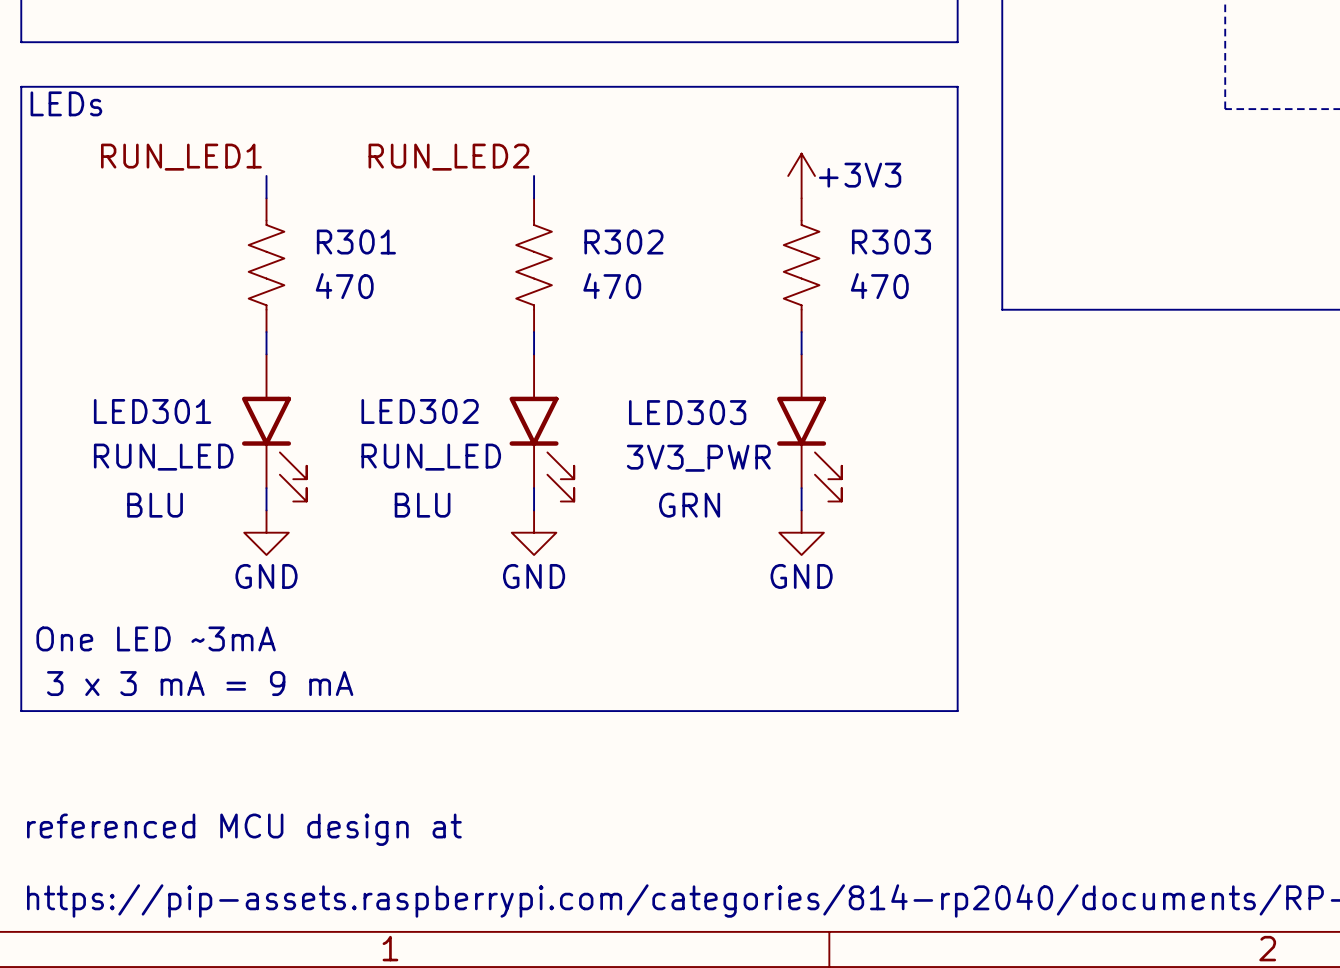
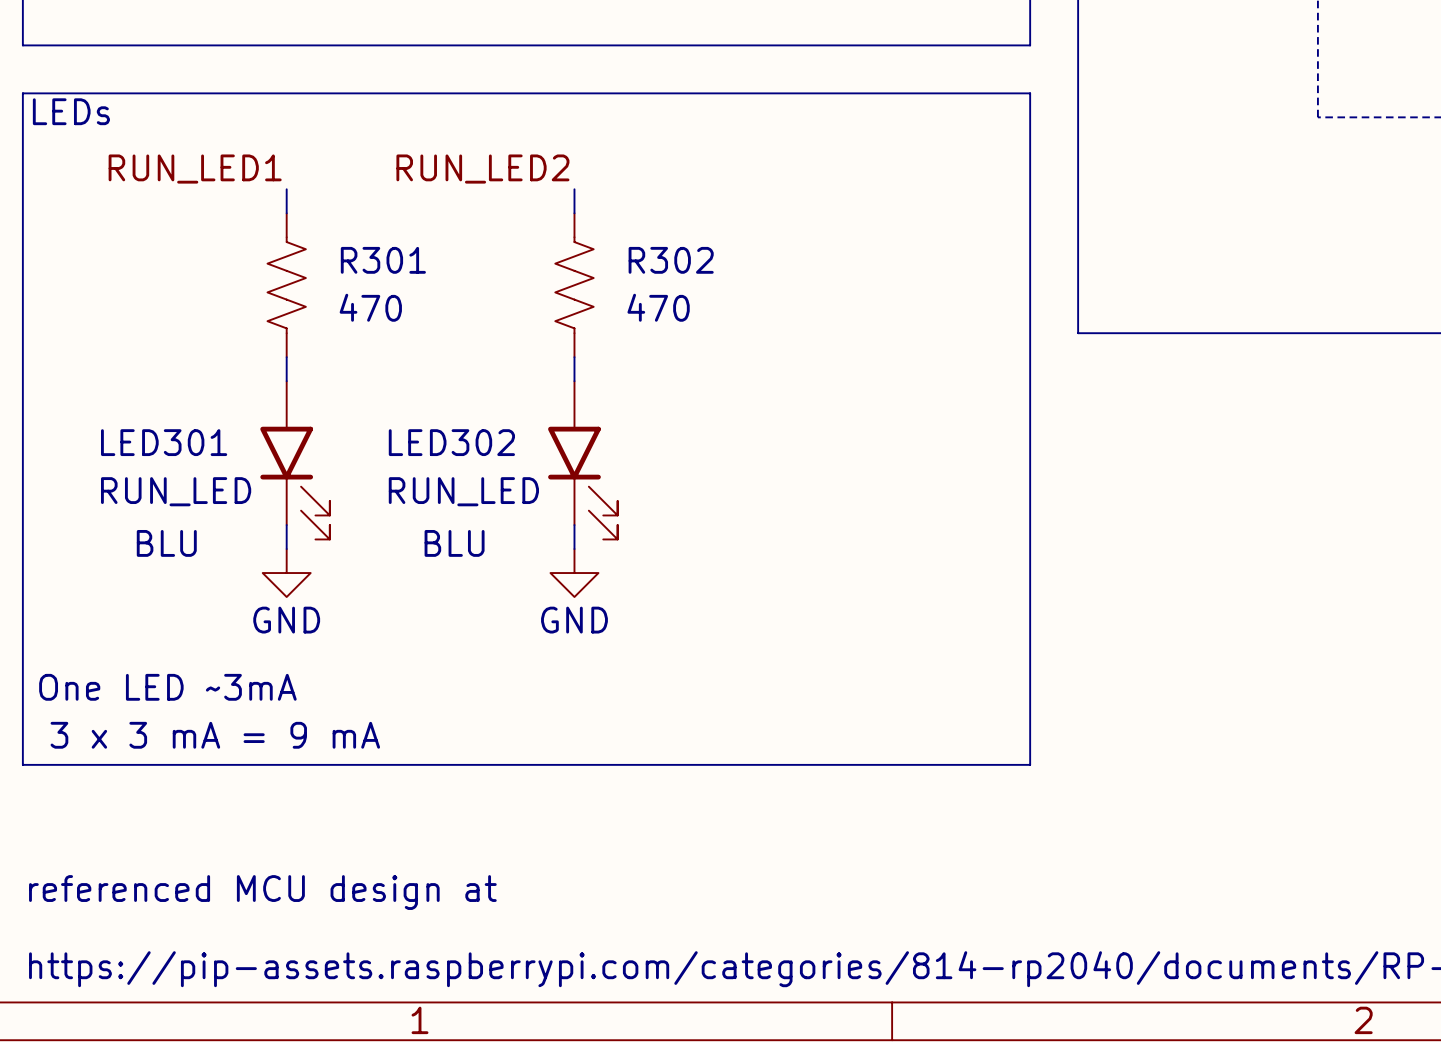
power symbol: +3V3 (801, 175) -> none
R303: 470 (801, 265) -> none
wire: (801, 332) (801, 354) -> none
LED303: 3V3_PWR (809, 427) -> none
wire: (801, 488) (801, 510) -> none
text: GRN (689, 505) -> none
power symbol: GND (801, 532) -> none

